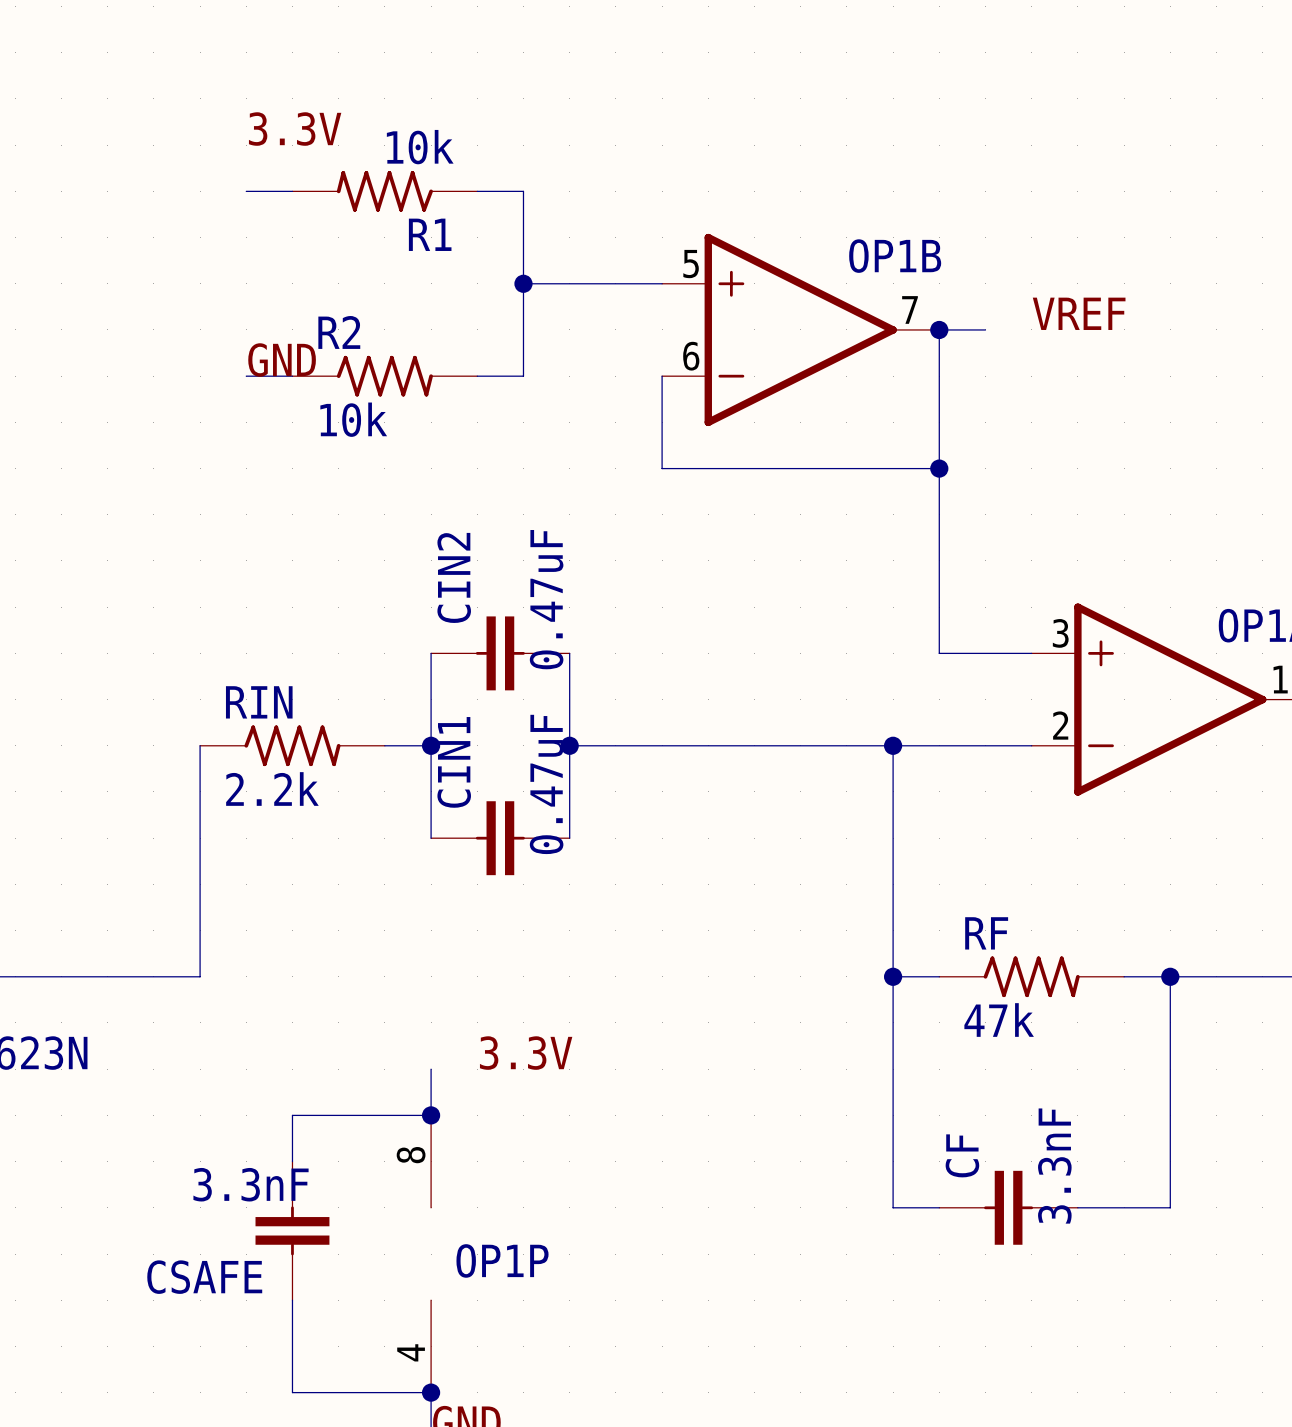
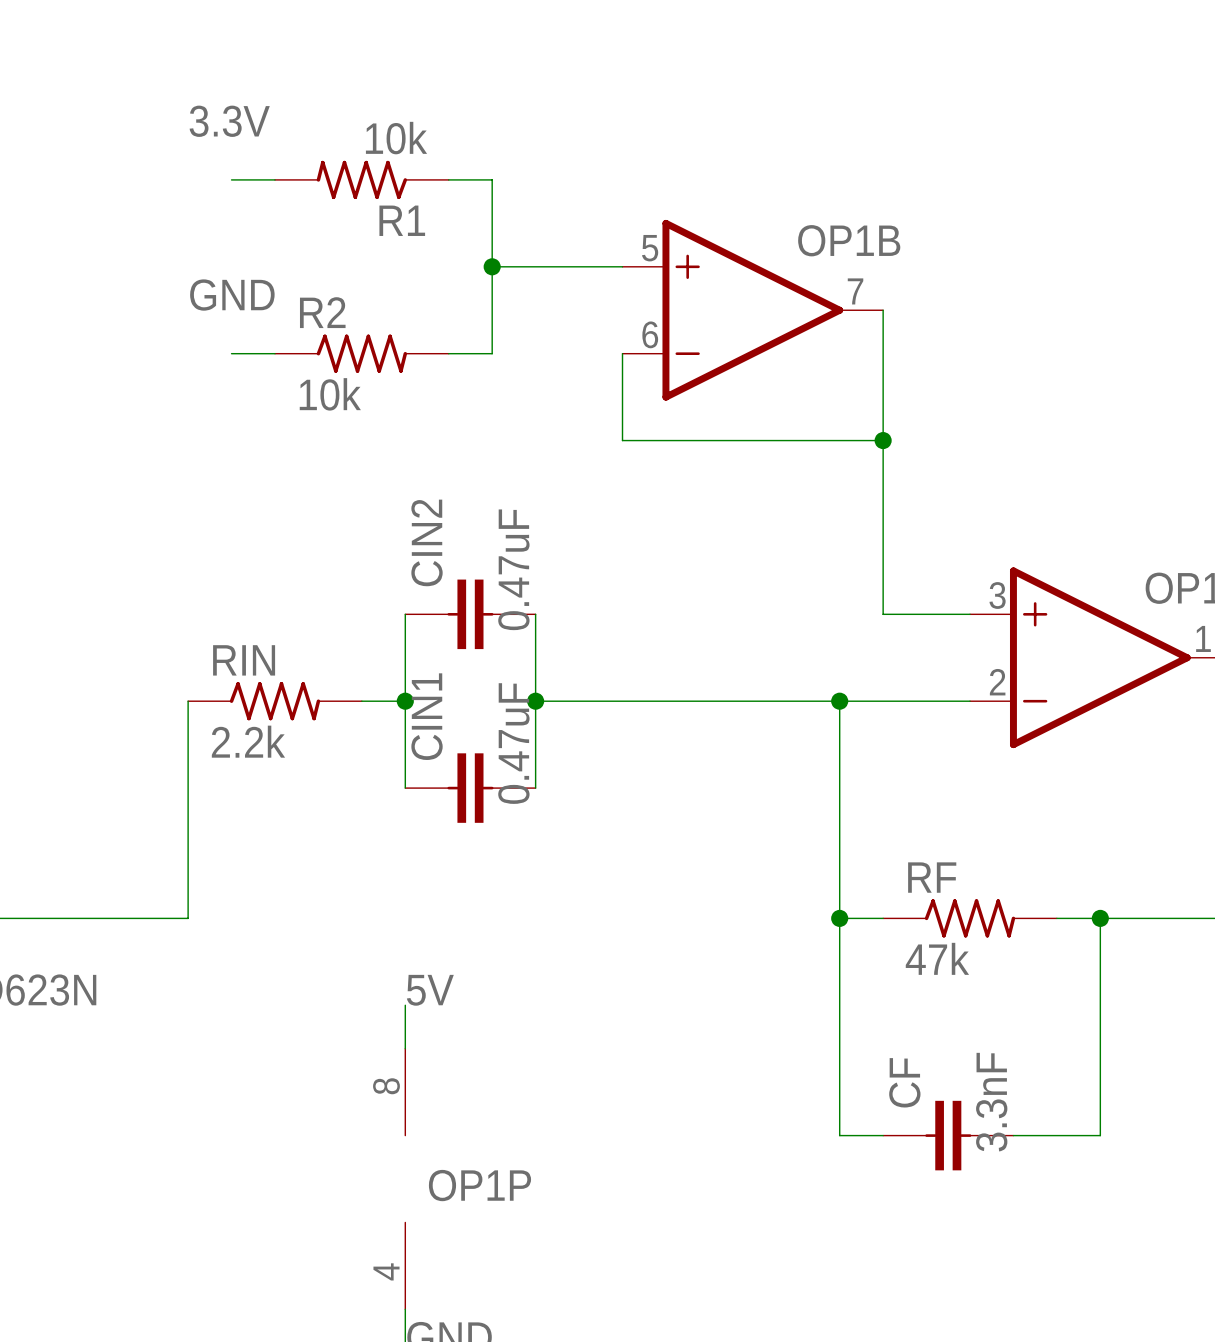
label position: 3.3V (295, 129) -> 3.3V (229, 121)
label: VREF (1079, 313) -> none
wire: (939, 329) (985, 329) -> none
junction: (939, 329) -> none
label position: GND (282, 360) -> GND (232, 295)
label: none -> 5V (430, 990)
label: 3.3V (526, 1053) -> none
wire: (431, 1115) (292, 1115) (292, 1161) -> none
junction: (431, 1115) -> none
CSAFE: 3.3nF (292, 1230) -> none
wire: (292, 1300) (292, 1392) (431, 1392) -> none
junction: (431, 1392) -> none

